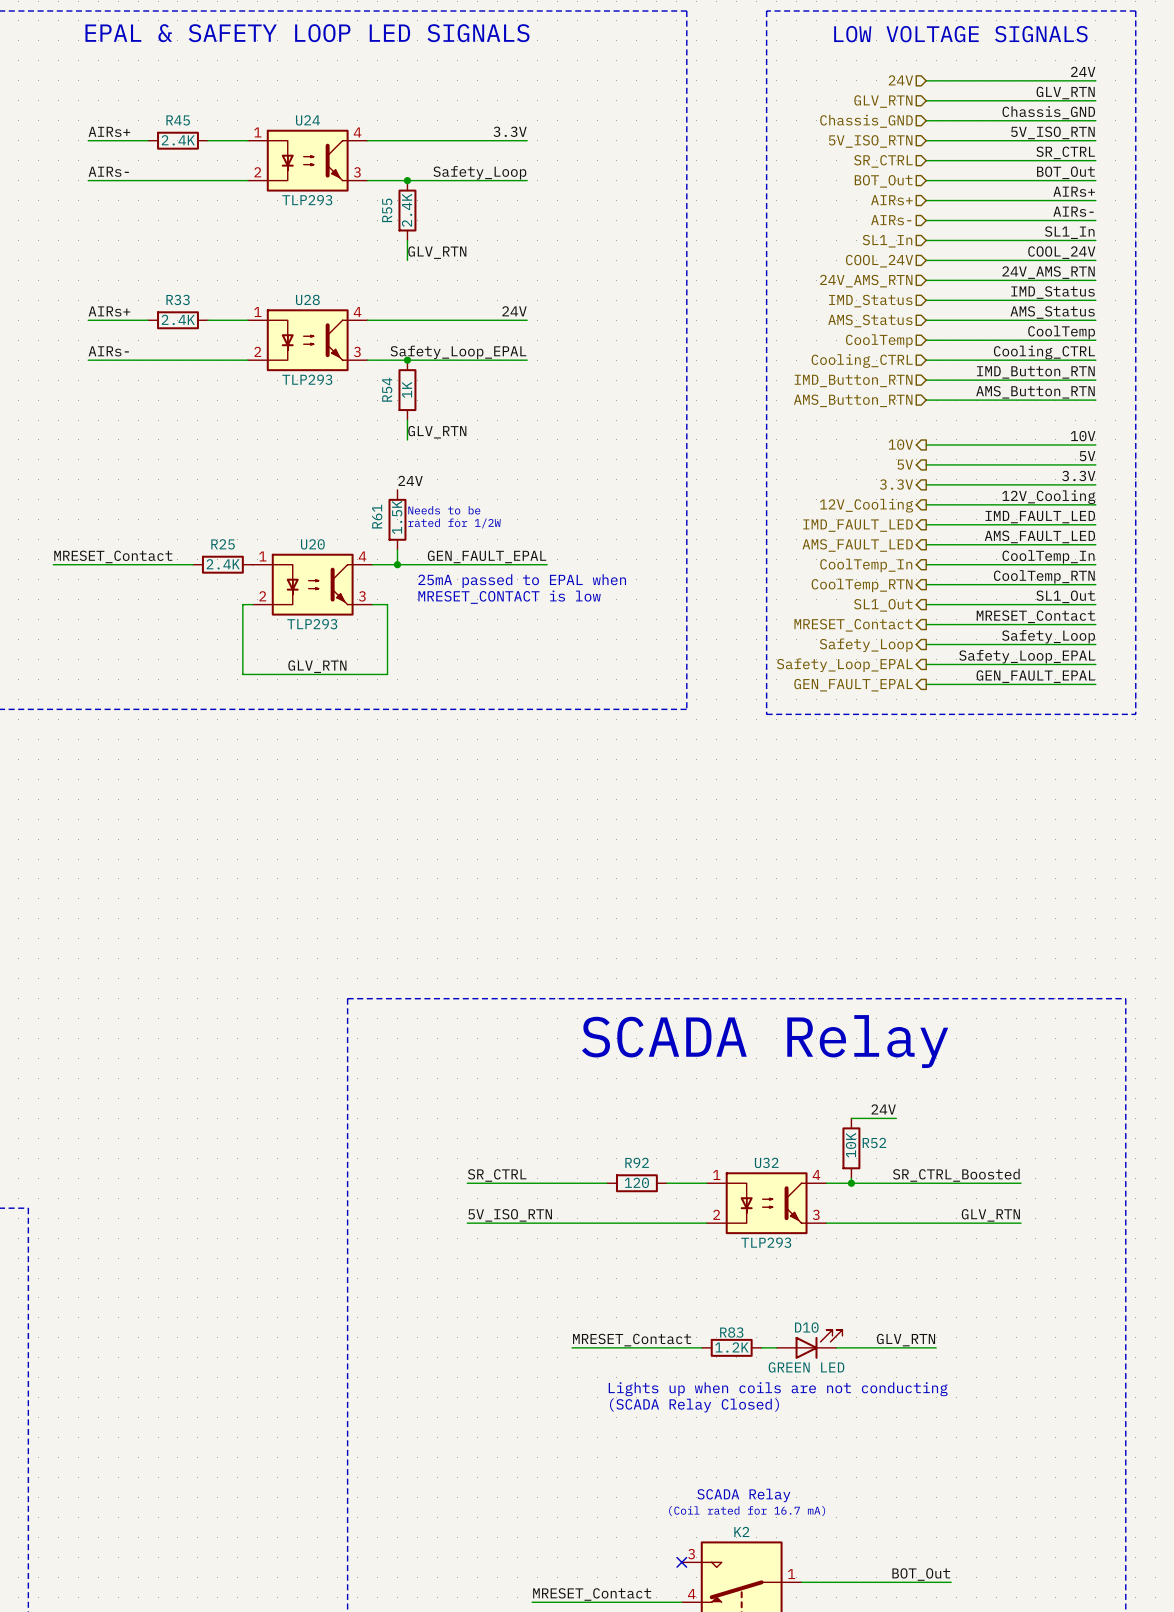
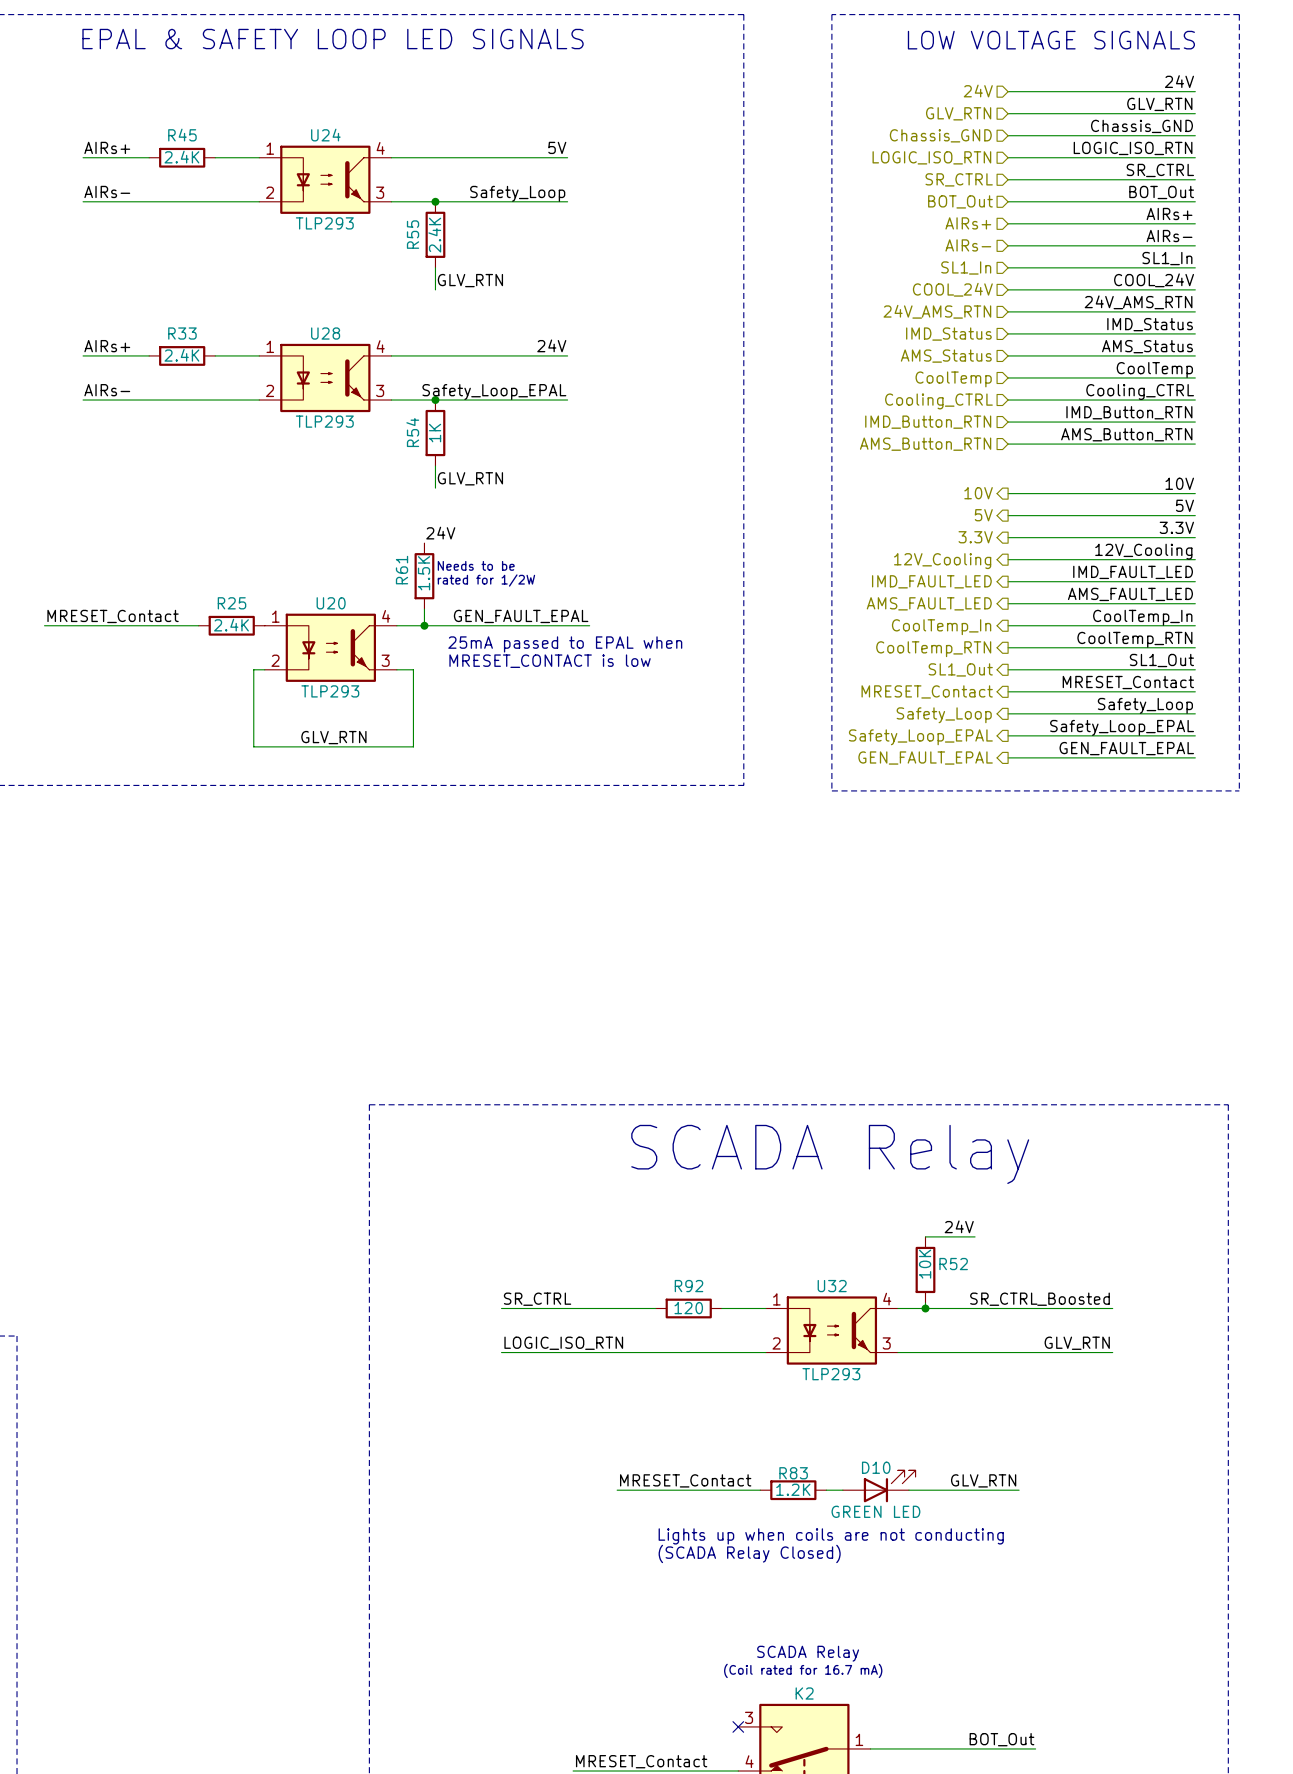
label: 3.3V (510, 131) -> 5V (557, 147)
label: 5V_ISO_RTN (1052, 132) -> LOGIC_ISO_RTN (1133, 148)
hierarchical label: 5V_ISO_RTN (870, 141) -> LOGIC_ISO_RTN (931, 157)
label: 5V_ISO_RTN (510, 1215) -> LOGIC_ISO_RTN (563, 1343)

